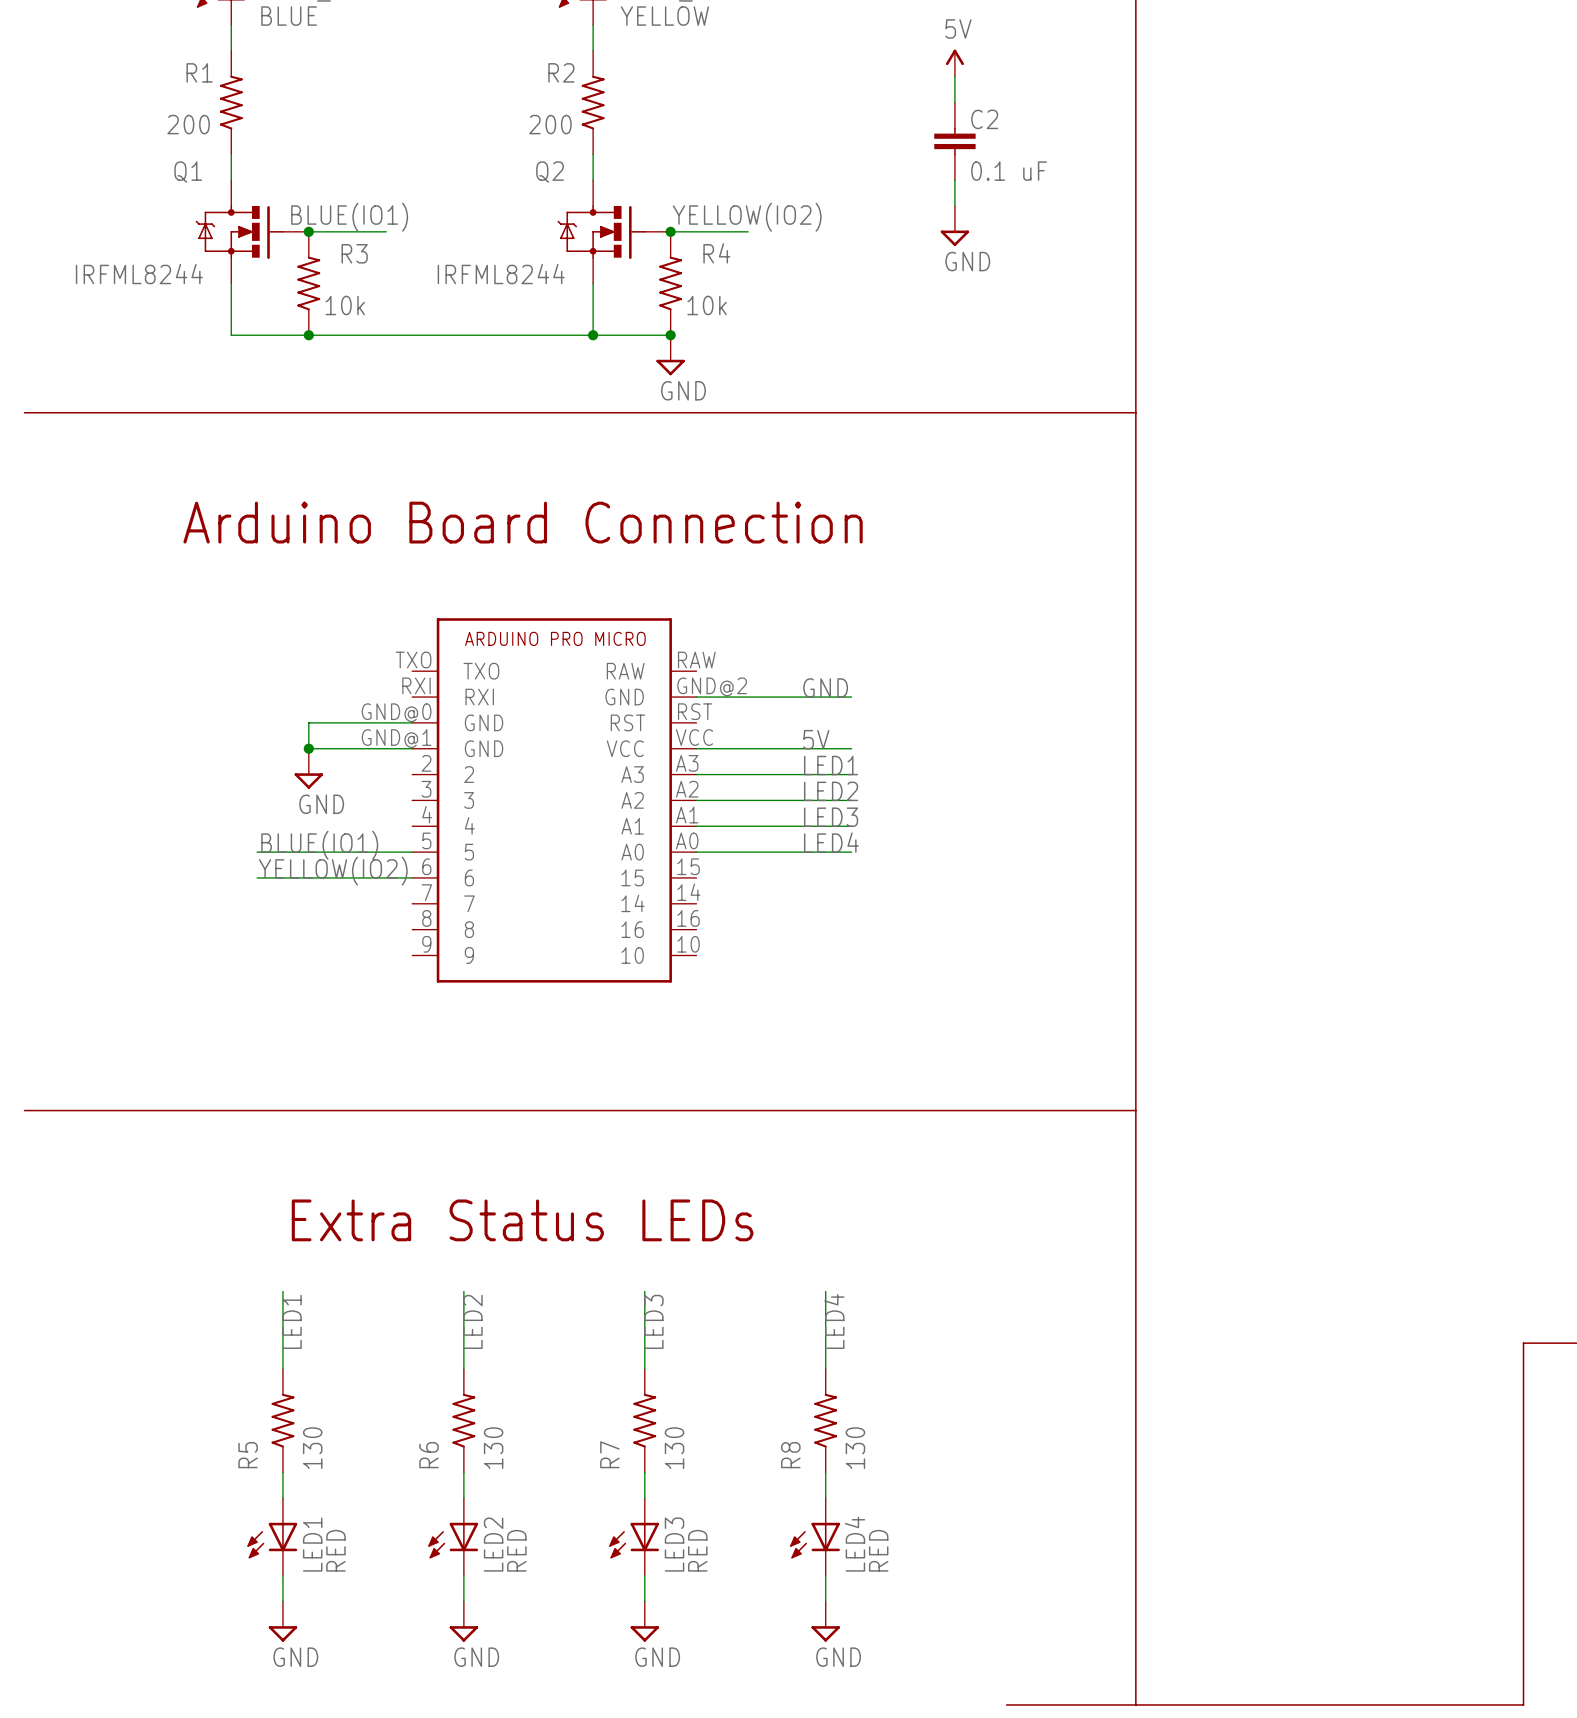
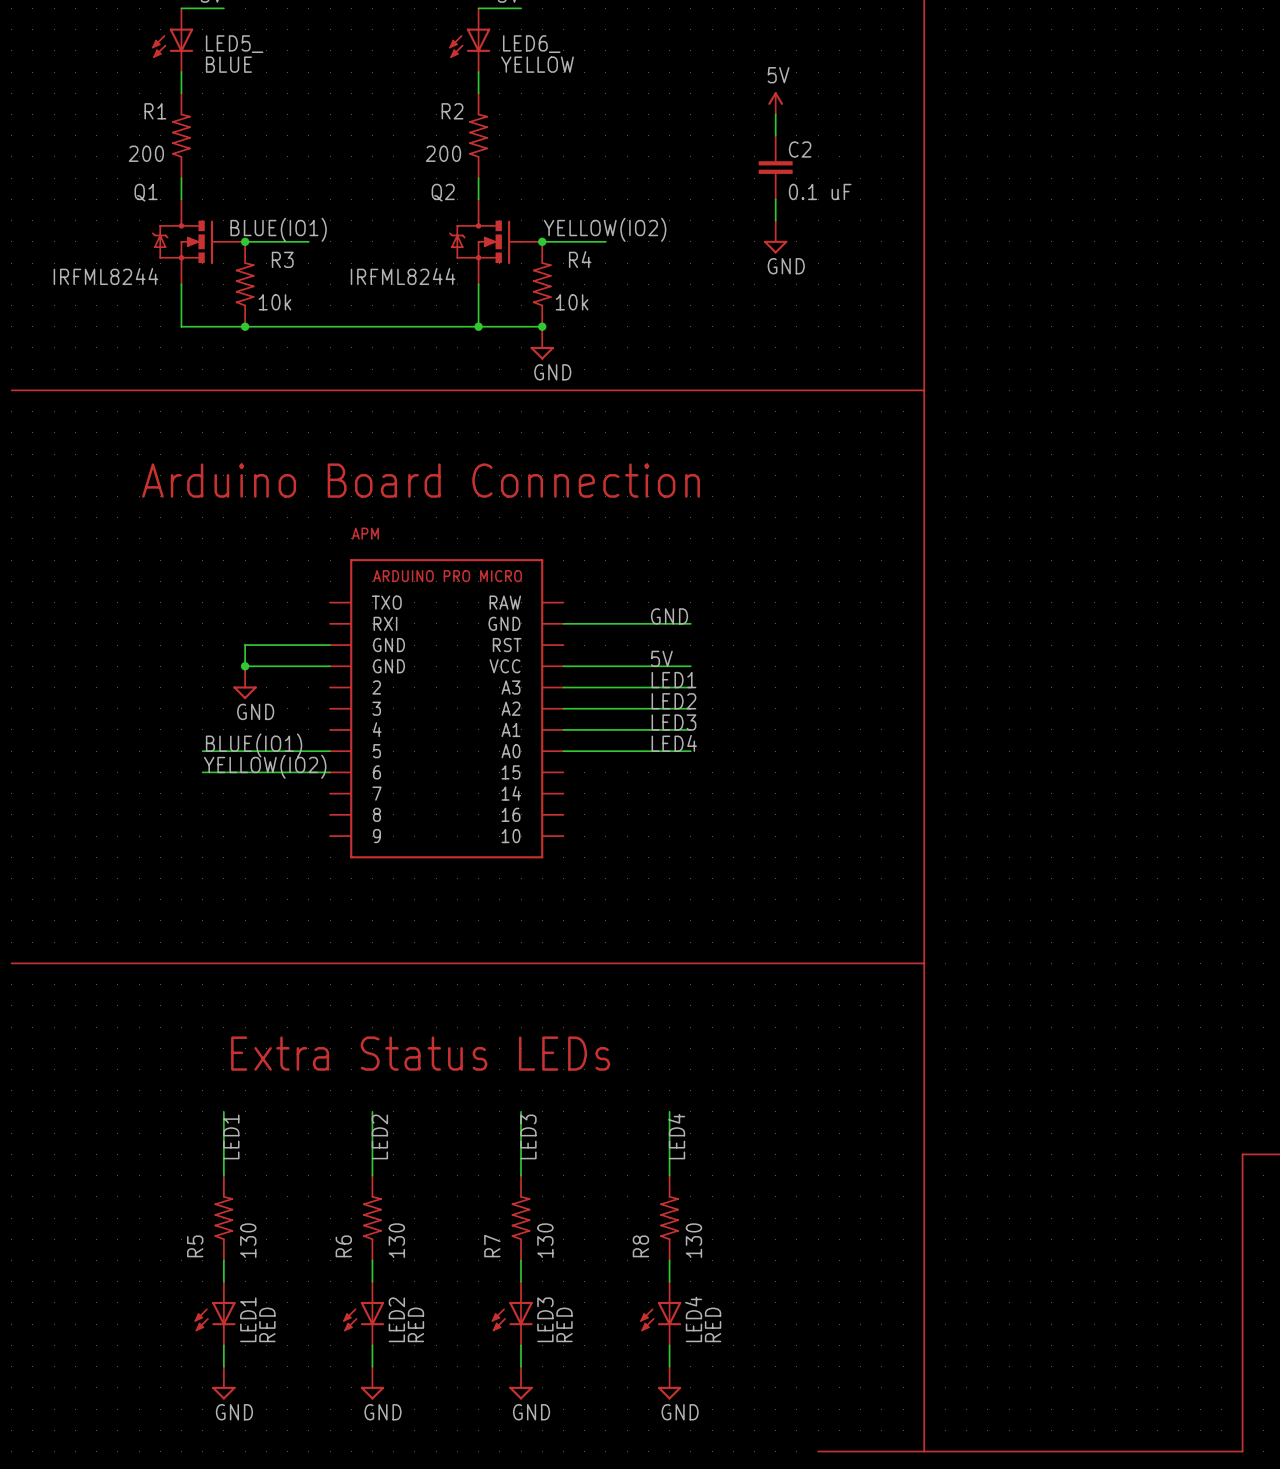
APM name: none -> APM (365, 533)
APM symbol: [412, 618, 697, 983] -> [330, 559, 564, 859]

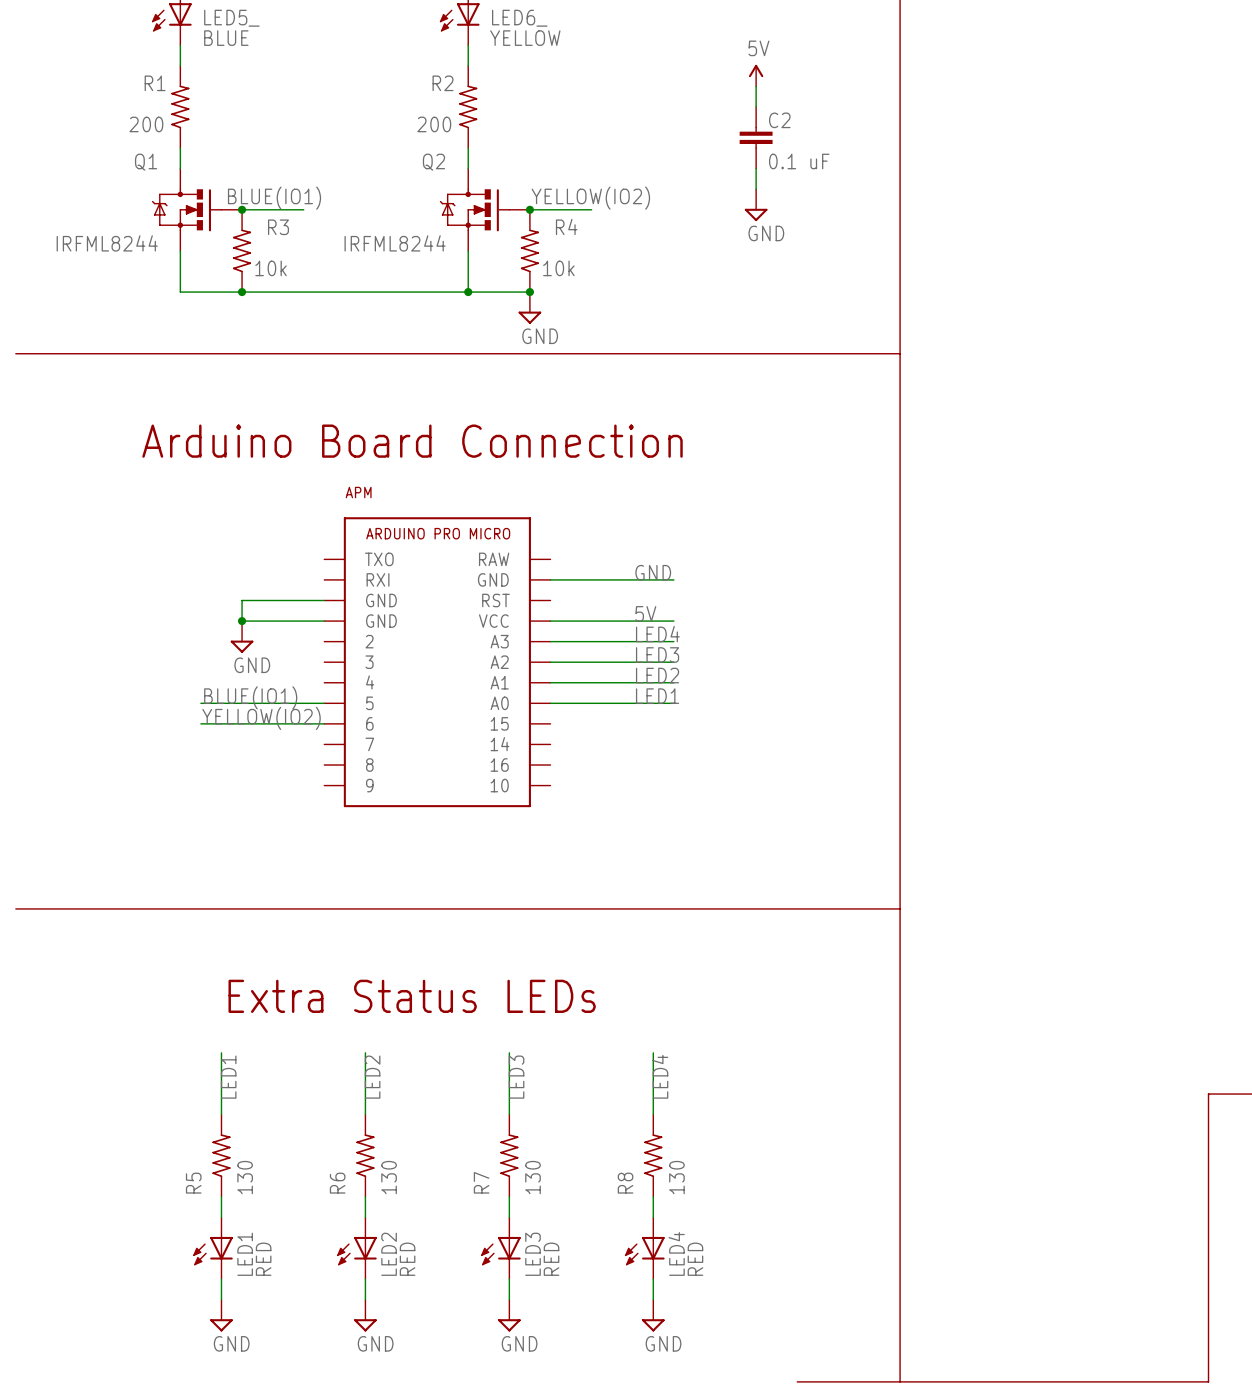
label: LED1 (673, 680) -> LED4 (657, 634)
label: LED2 (673, 701) -> LED3 (657, 654)
label: LED3 (673, 722) -> LED2 (657, 675)
label: LED4 (674, 743) -> LED1 (657, 696)

